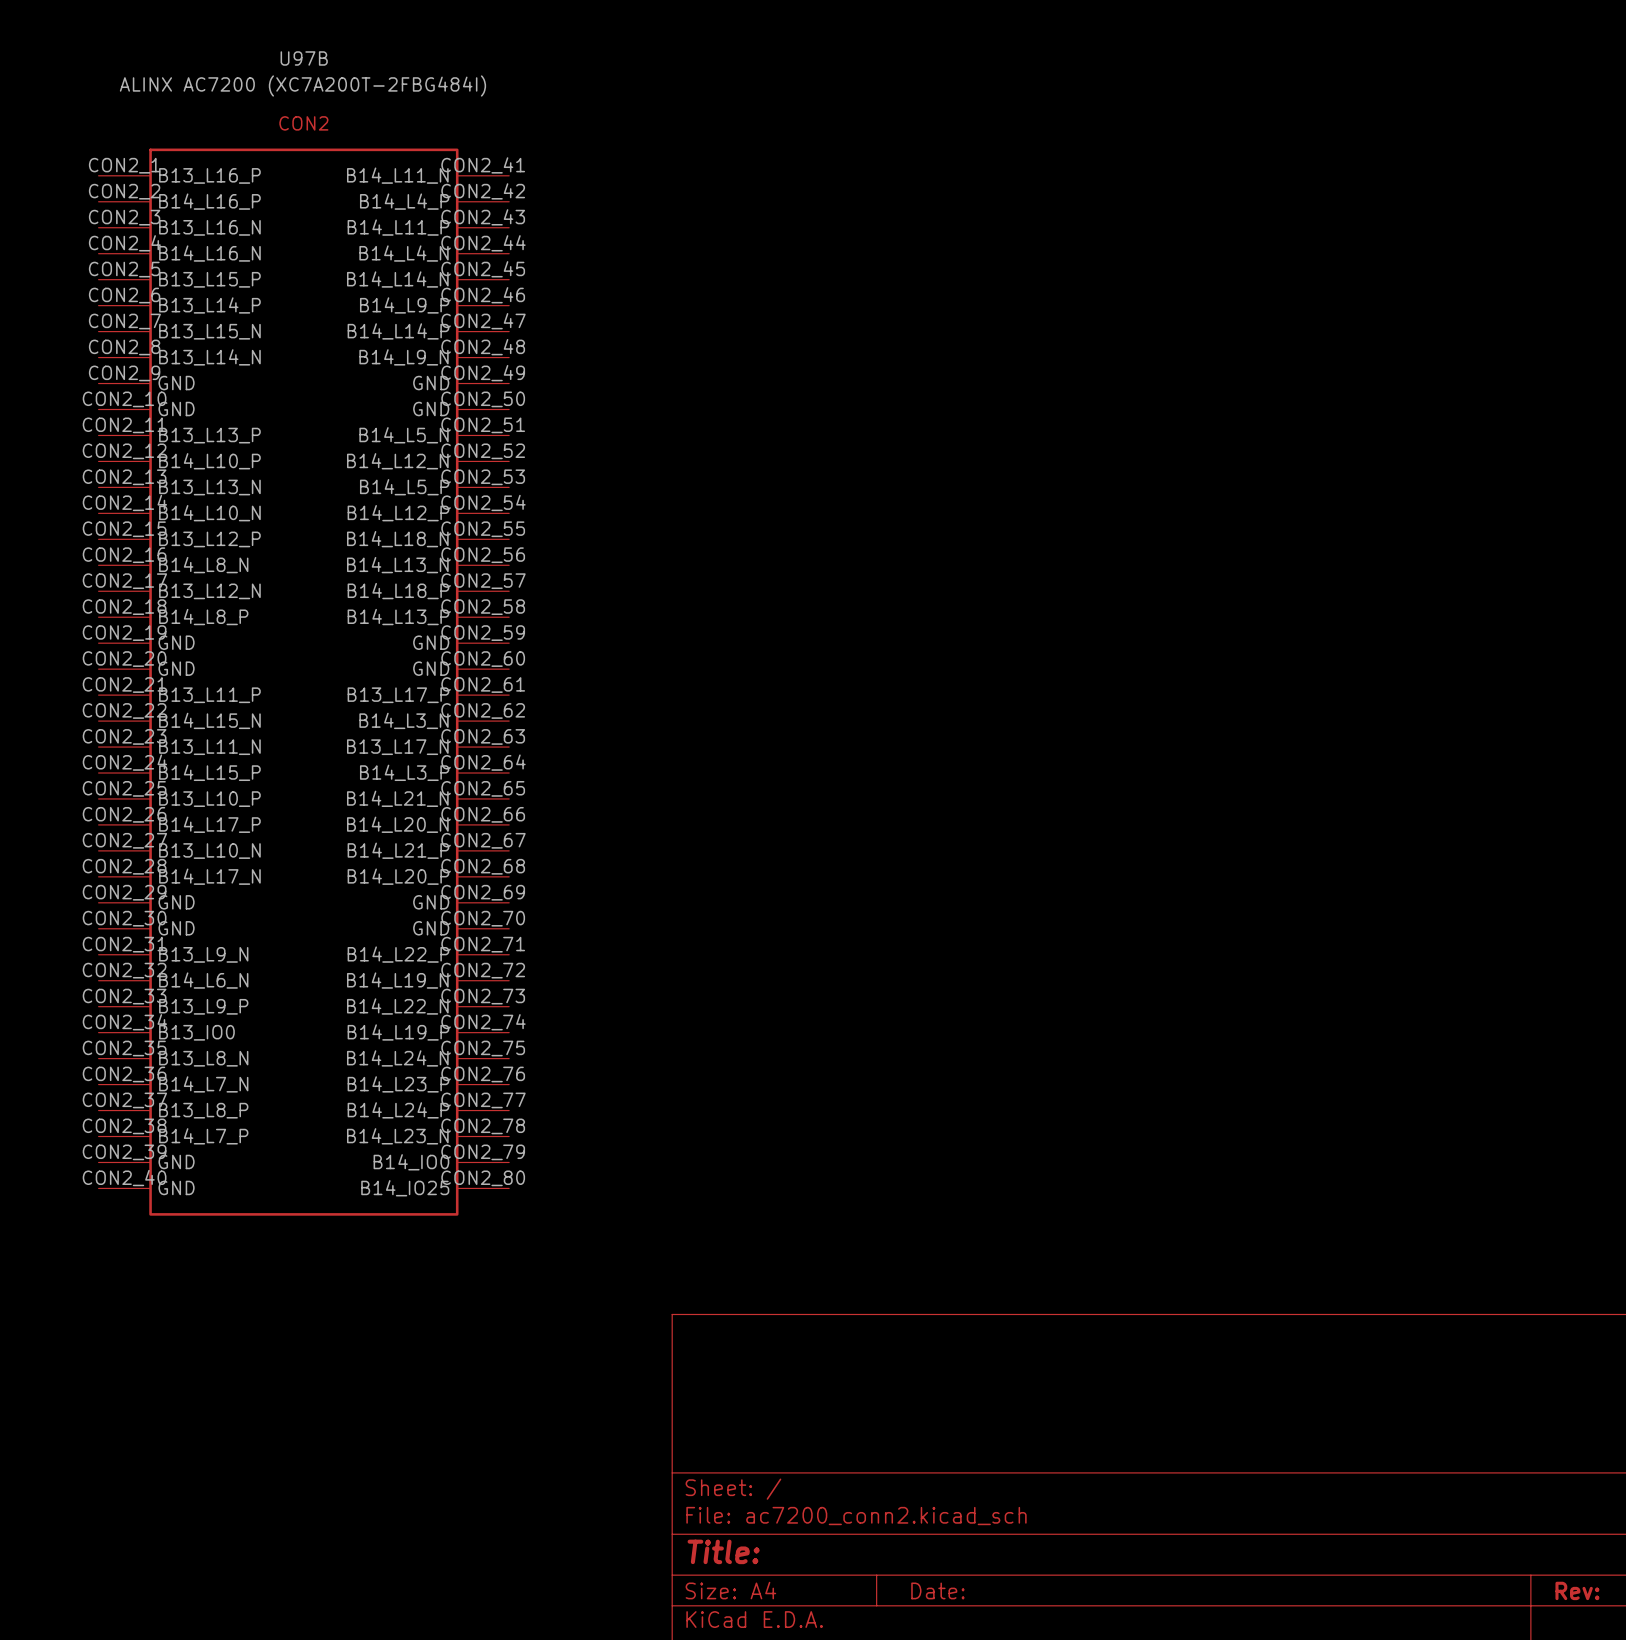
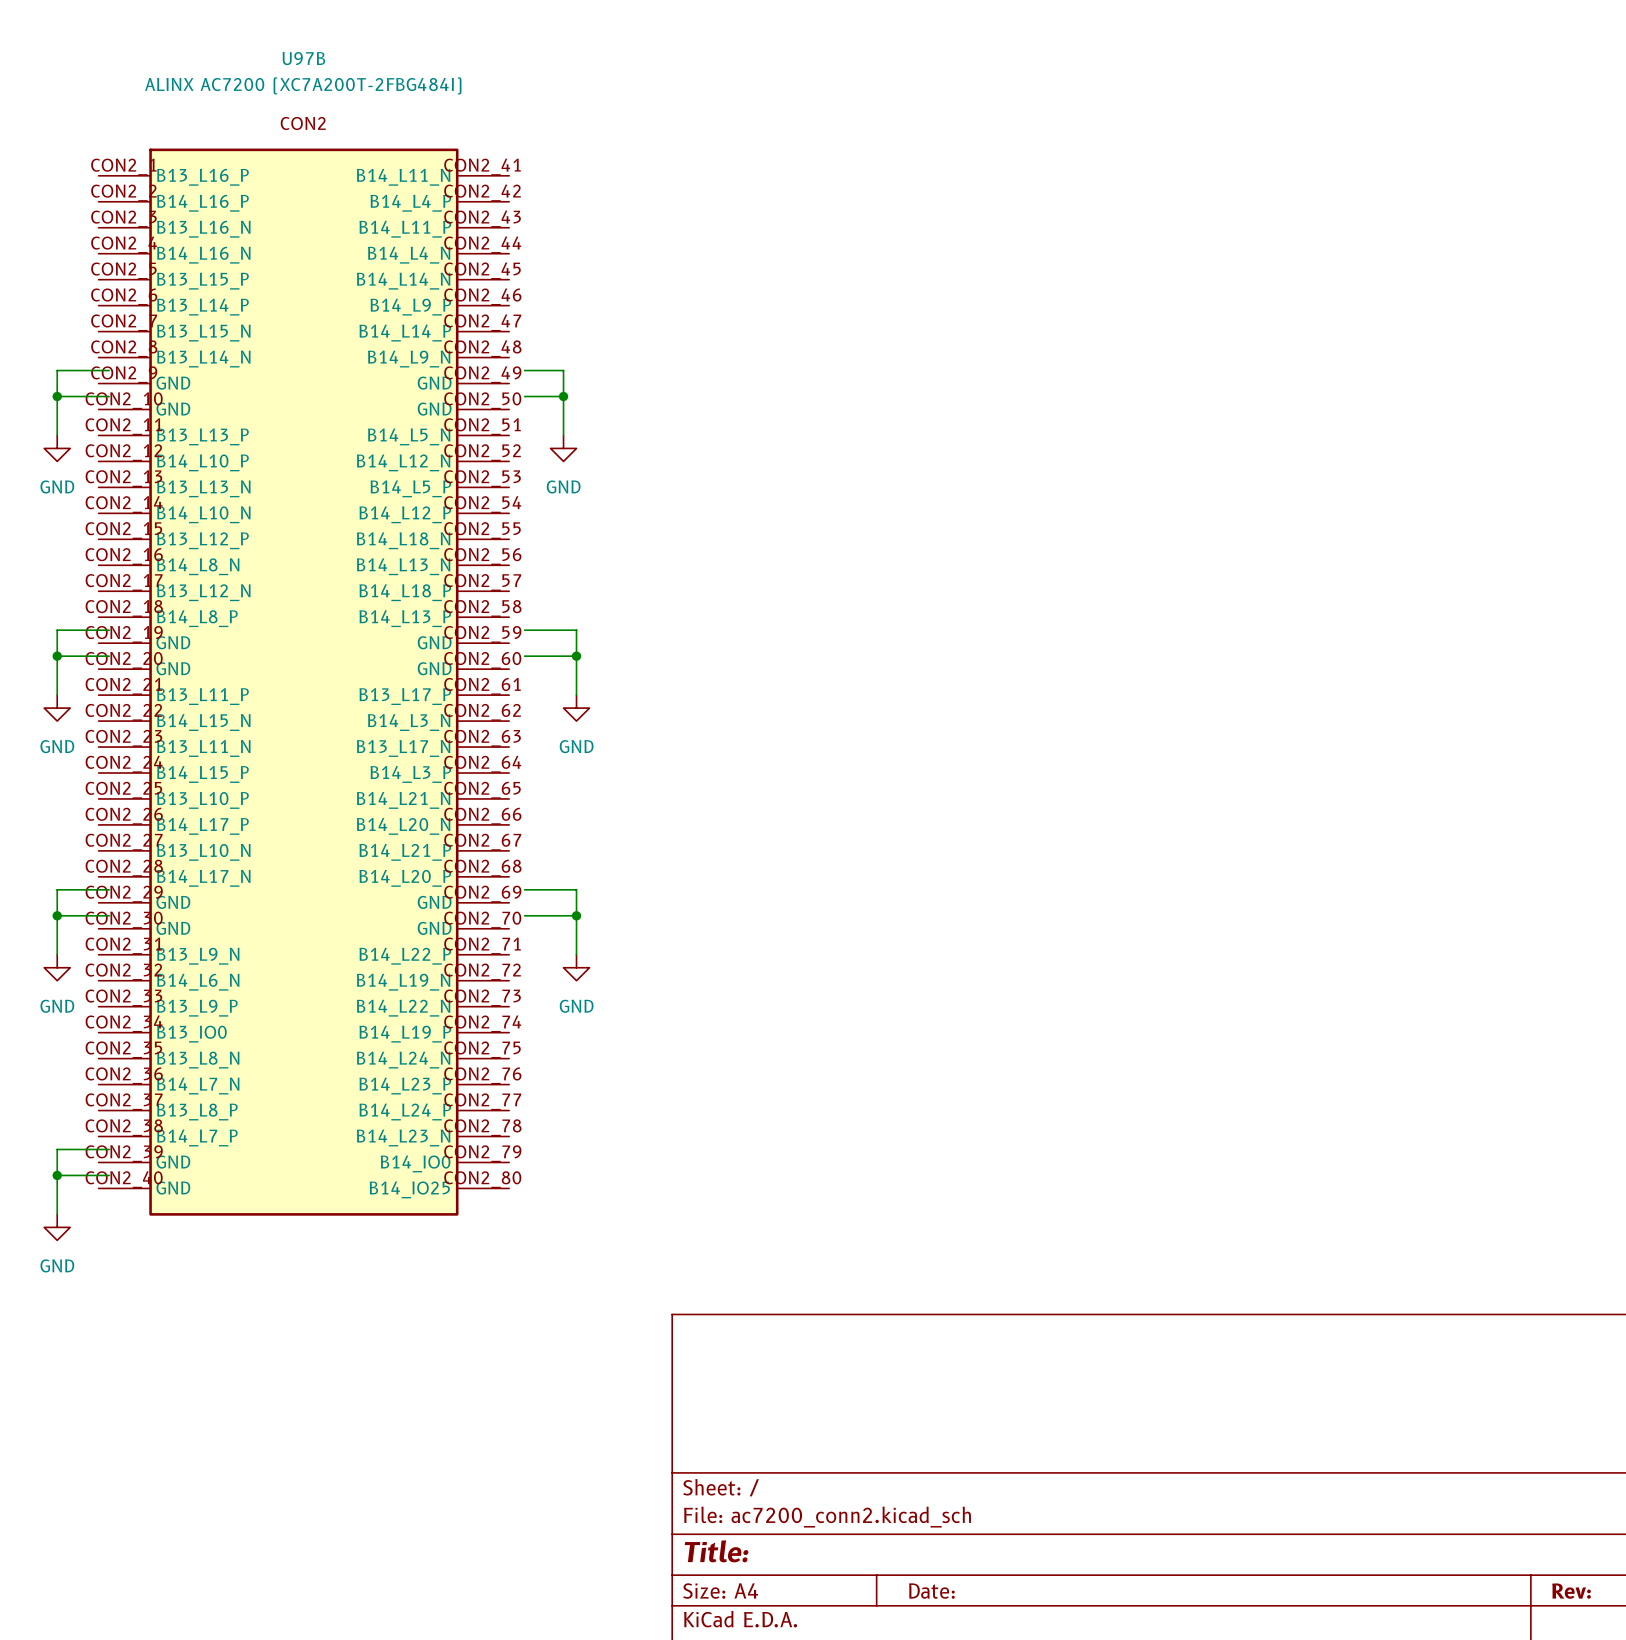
wire: none -> (109, 370) (57, 370) (57, 435)
wire: none -> (524, 370) (563, 370) (563, 435)
wire: none -> (57, 396) (109, 396)
junction: none -> (57, 396)
wire: none -> (524, 396) (563, 396)
junction: none -> (563, 396)
power symbol: none -> GND (57, 448)
power symbol: none -> GND (563, 448)
wire: none -> (109, 630) (57, 630) (57, 695)
wire: none -> (524, 630) (576, 630) (576, 695)
wire: none -> (57, 656) (109, 656)
junction: none -> (57, 656)
wire: none -> (524, 656) (576, 656)
junction: none -> (576, 656)
power symbol: none -> GND (57, 708)
power symbol: none -> GND (576, 708)
wire: none -> (109, 889) (57, 889) (57, 954)
wire: none -> (524, 889) (576, 889) (576, 954)
wire: none -> (57, 915) (109, 915)
junction: none -> (57, 915)
wire: none -> (524, 915) (576, 915)
junction: none -> (576, 915)
power symbol: none -> GND (57, 967)
power symbol: none -> GND (576, 967)
wire: none -> (109, 1149) (57, 1149) (57, 1214)
wire: none -> (57, 1175) (109, 1175)
junction: none -> (57, 1175)
power symbol: none -> GND (57, 1227)

